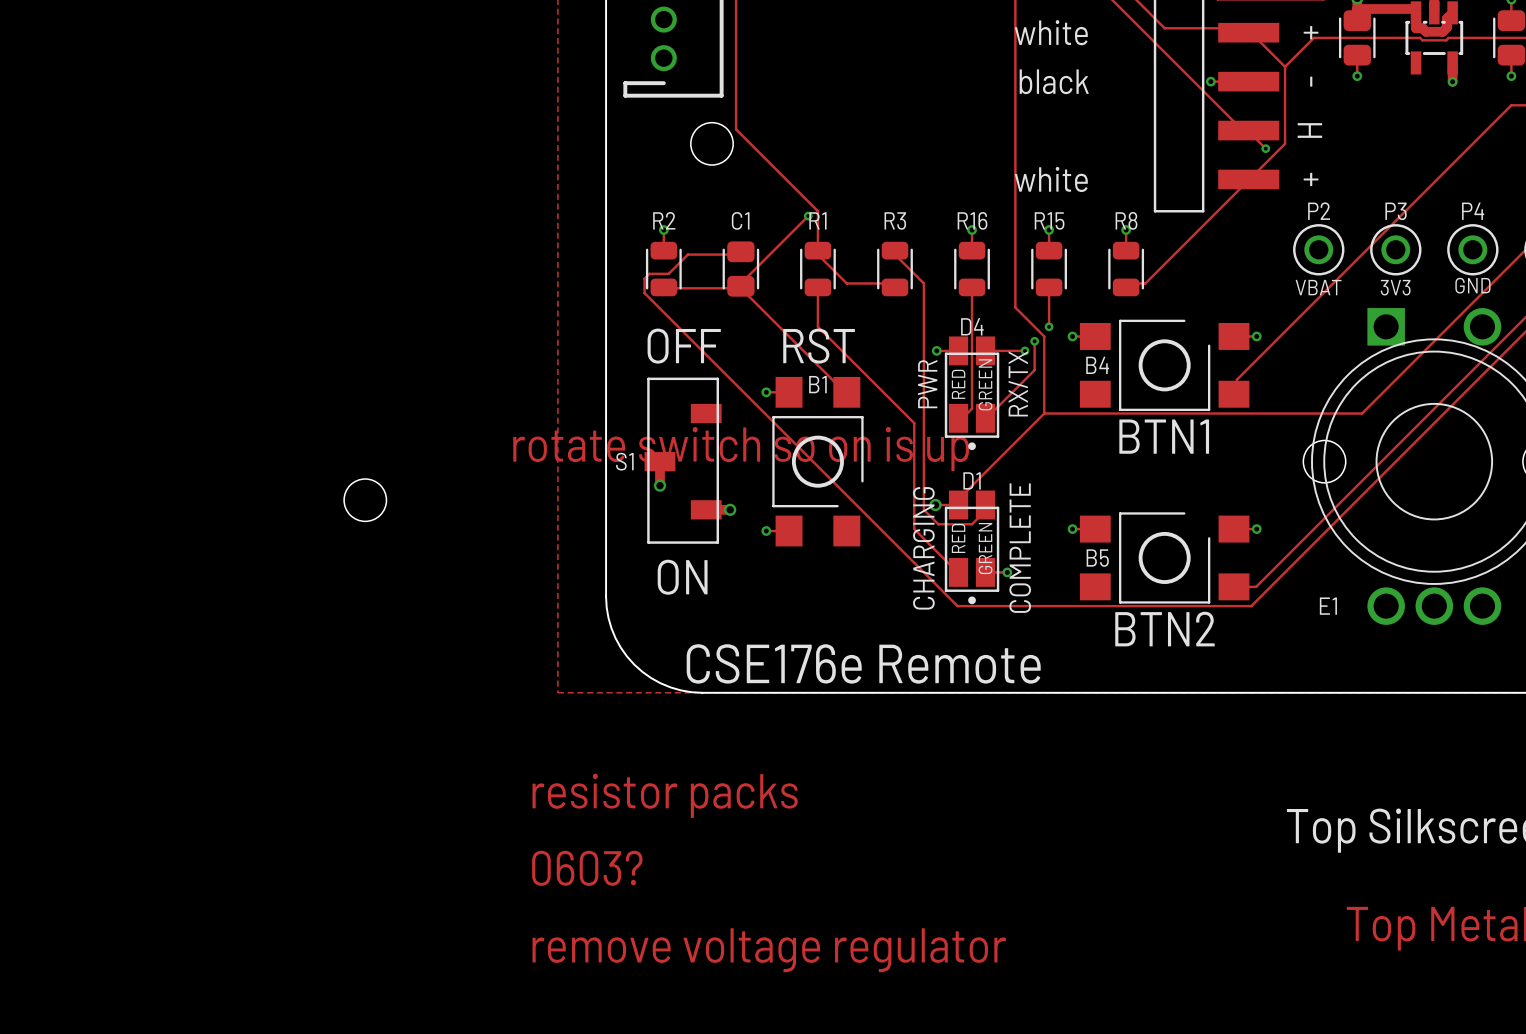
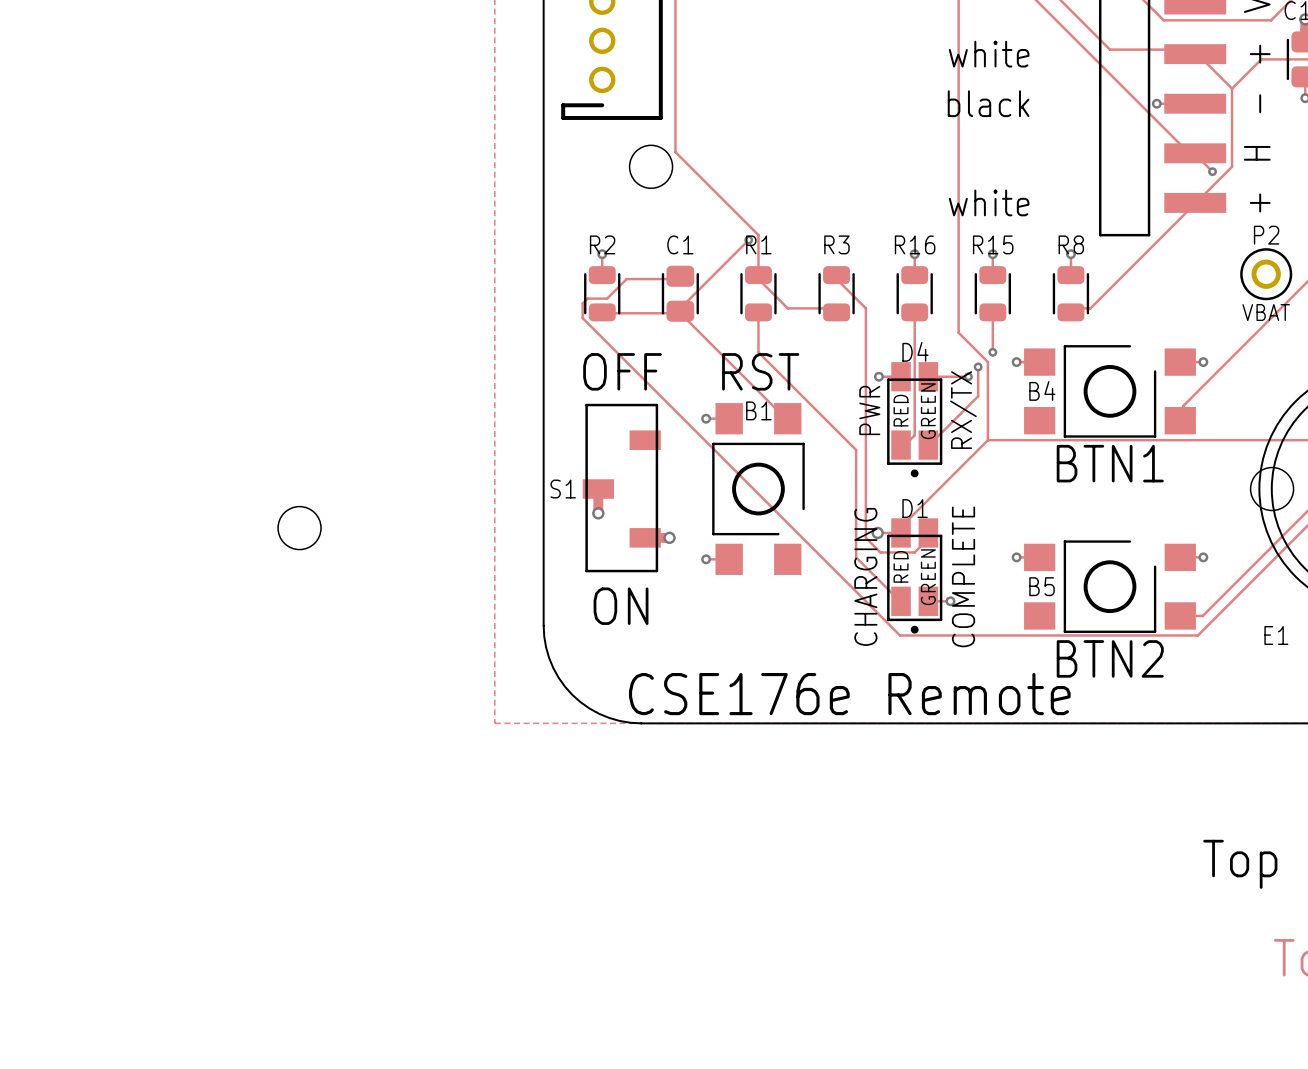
text: rotate switch so on is up (741, 449) -> none
text: resistor packs (665, 795) -> none
text: 0603? (587, 868) -> none
text: remove voltage regulator (769, 950) -> none

